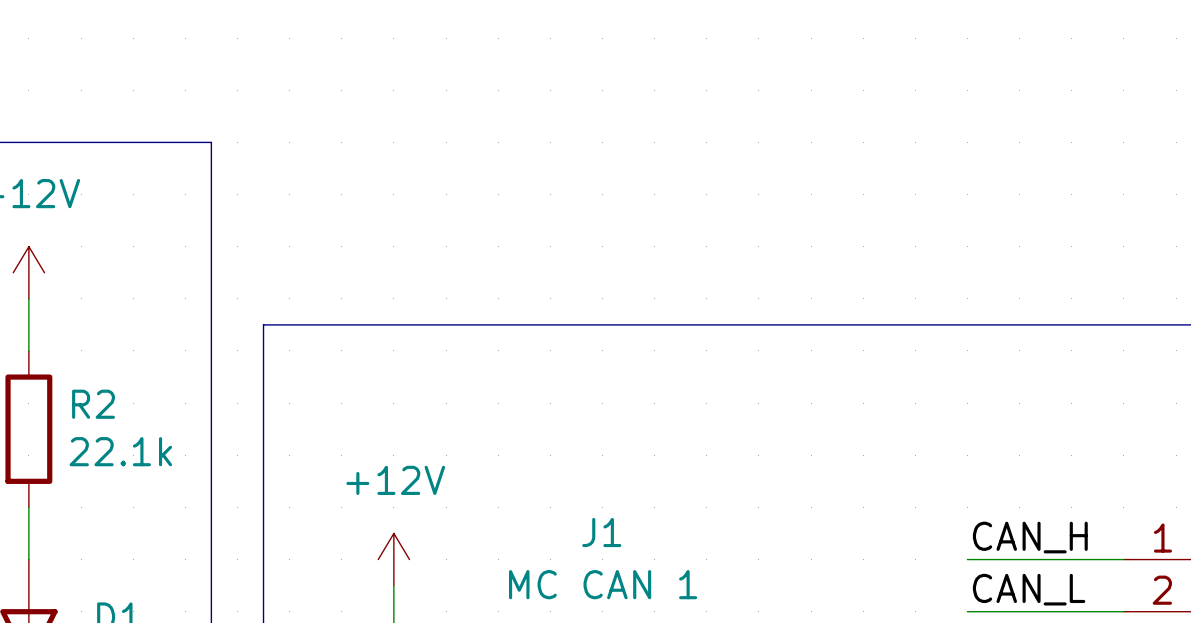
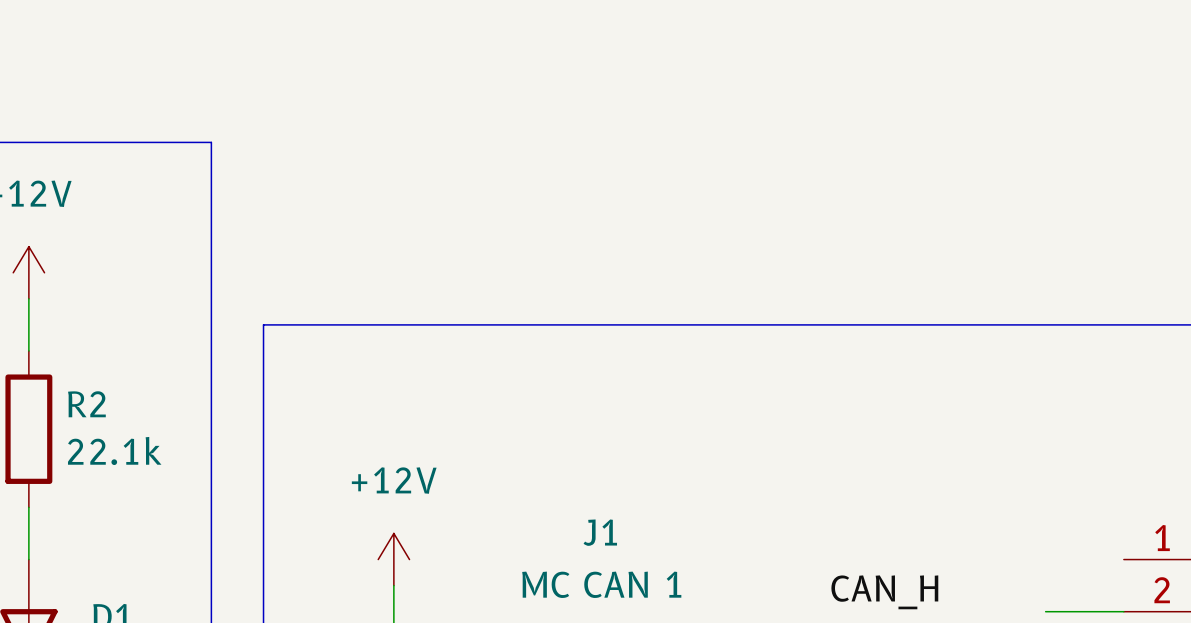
label position: CAN_H (1030, 537) -> CAN_H (884, 592)
wire: (967, 559) (1123, 559) -> none
label: CAN_L (1029, 589) -> none
wire: (967, 611) (1045, 611) -> none

